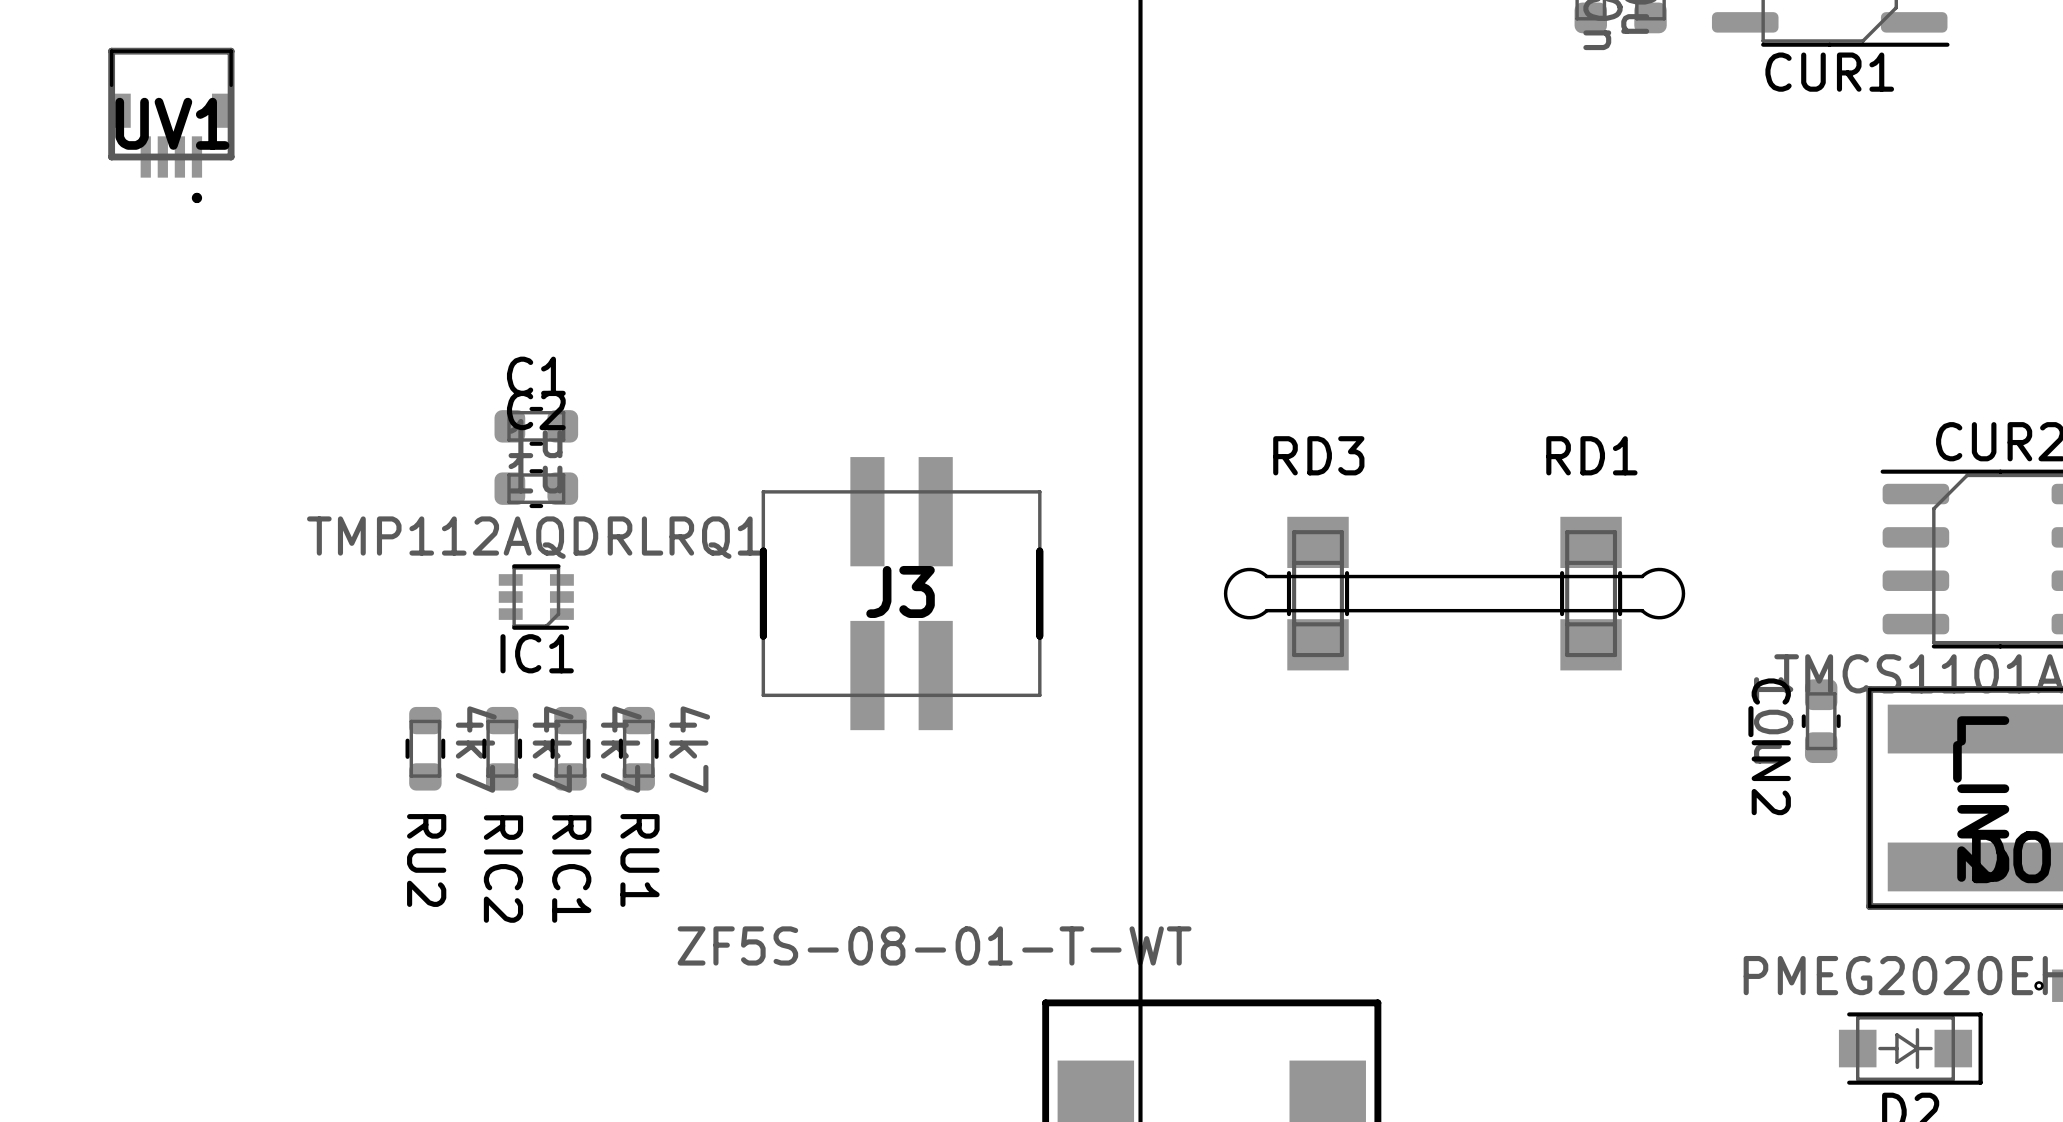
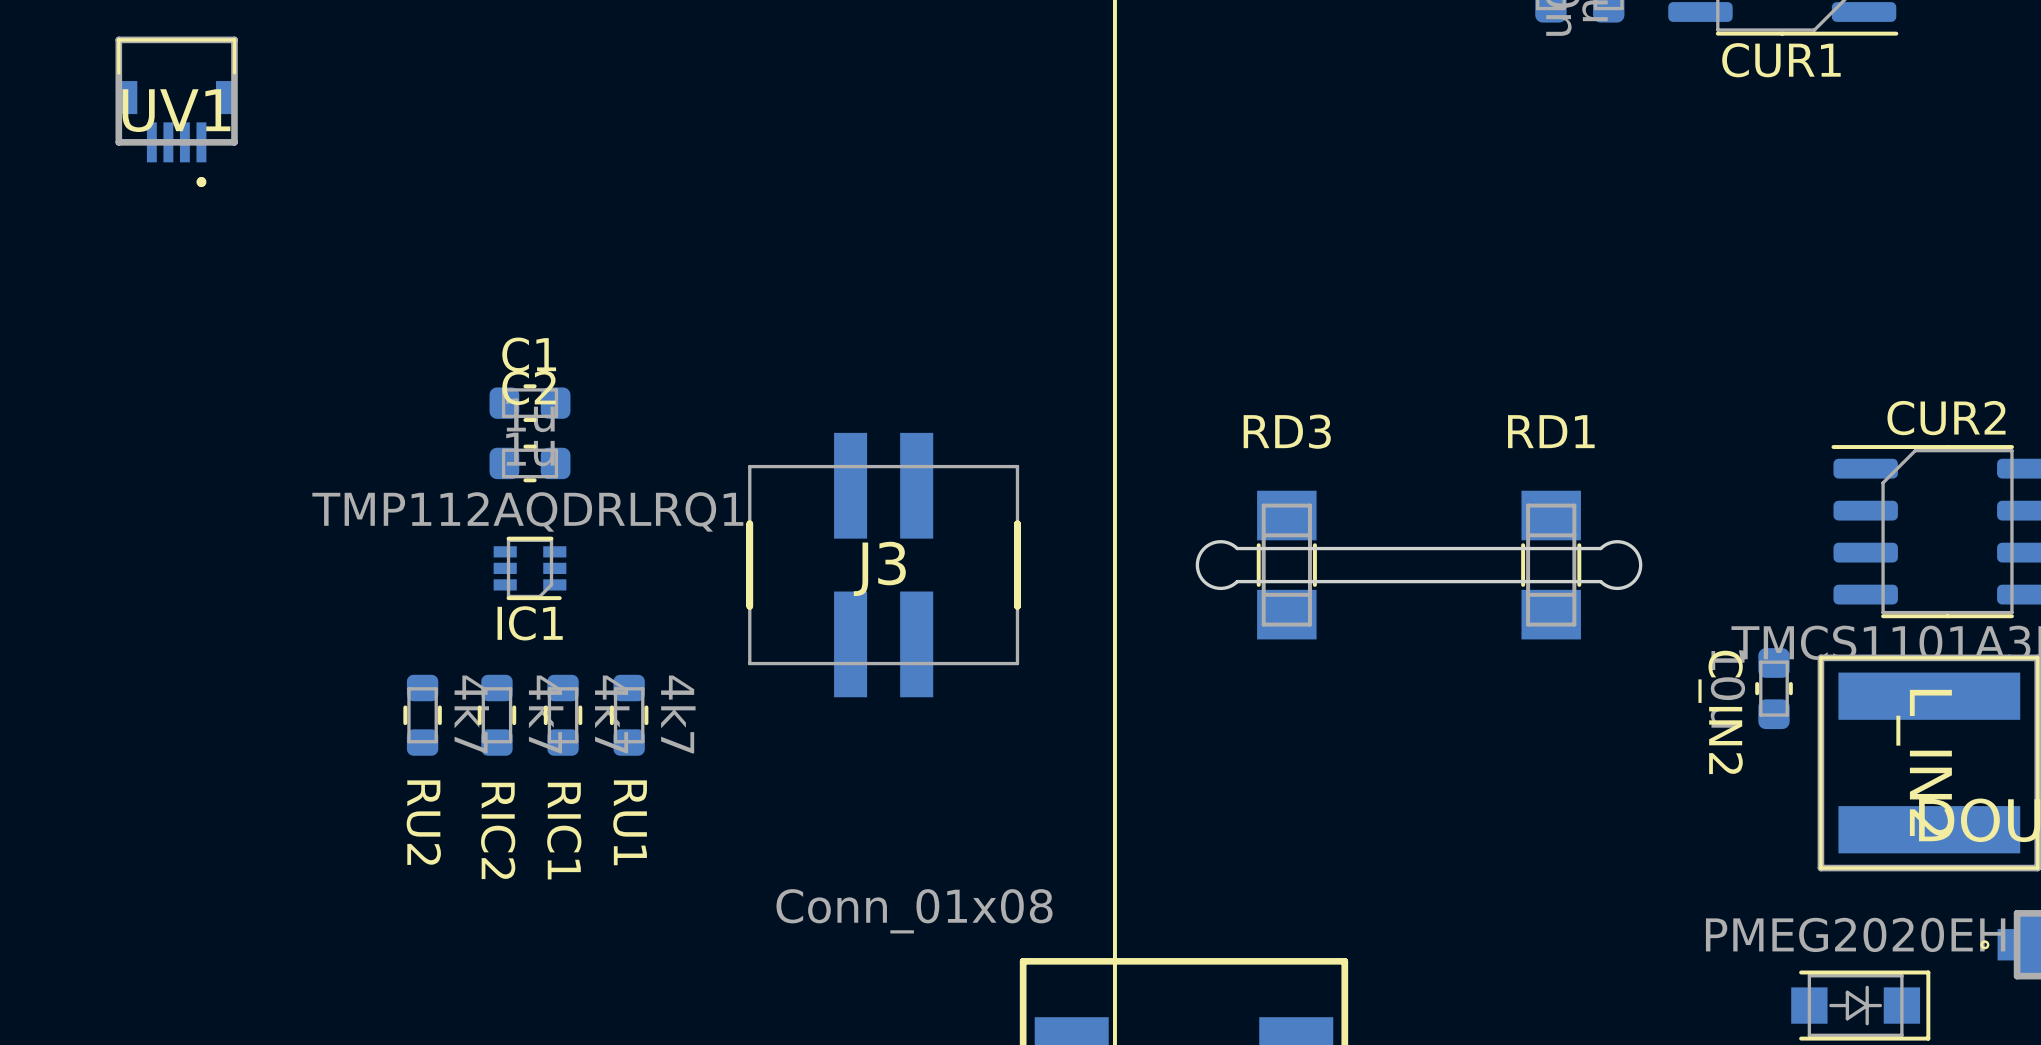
part value: ZF5S-08-01-T-WT (934, 945) -> Conn_01x08 (914, 911)

